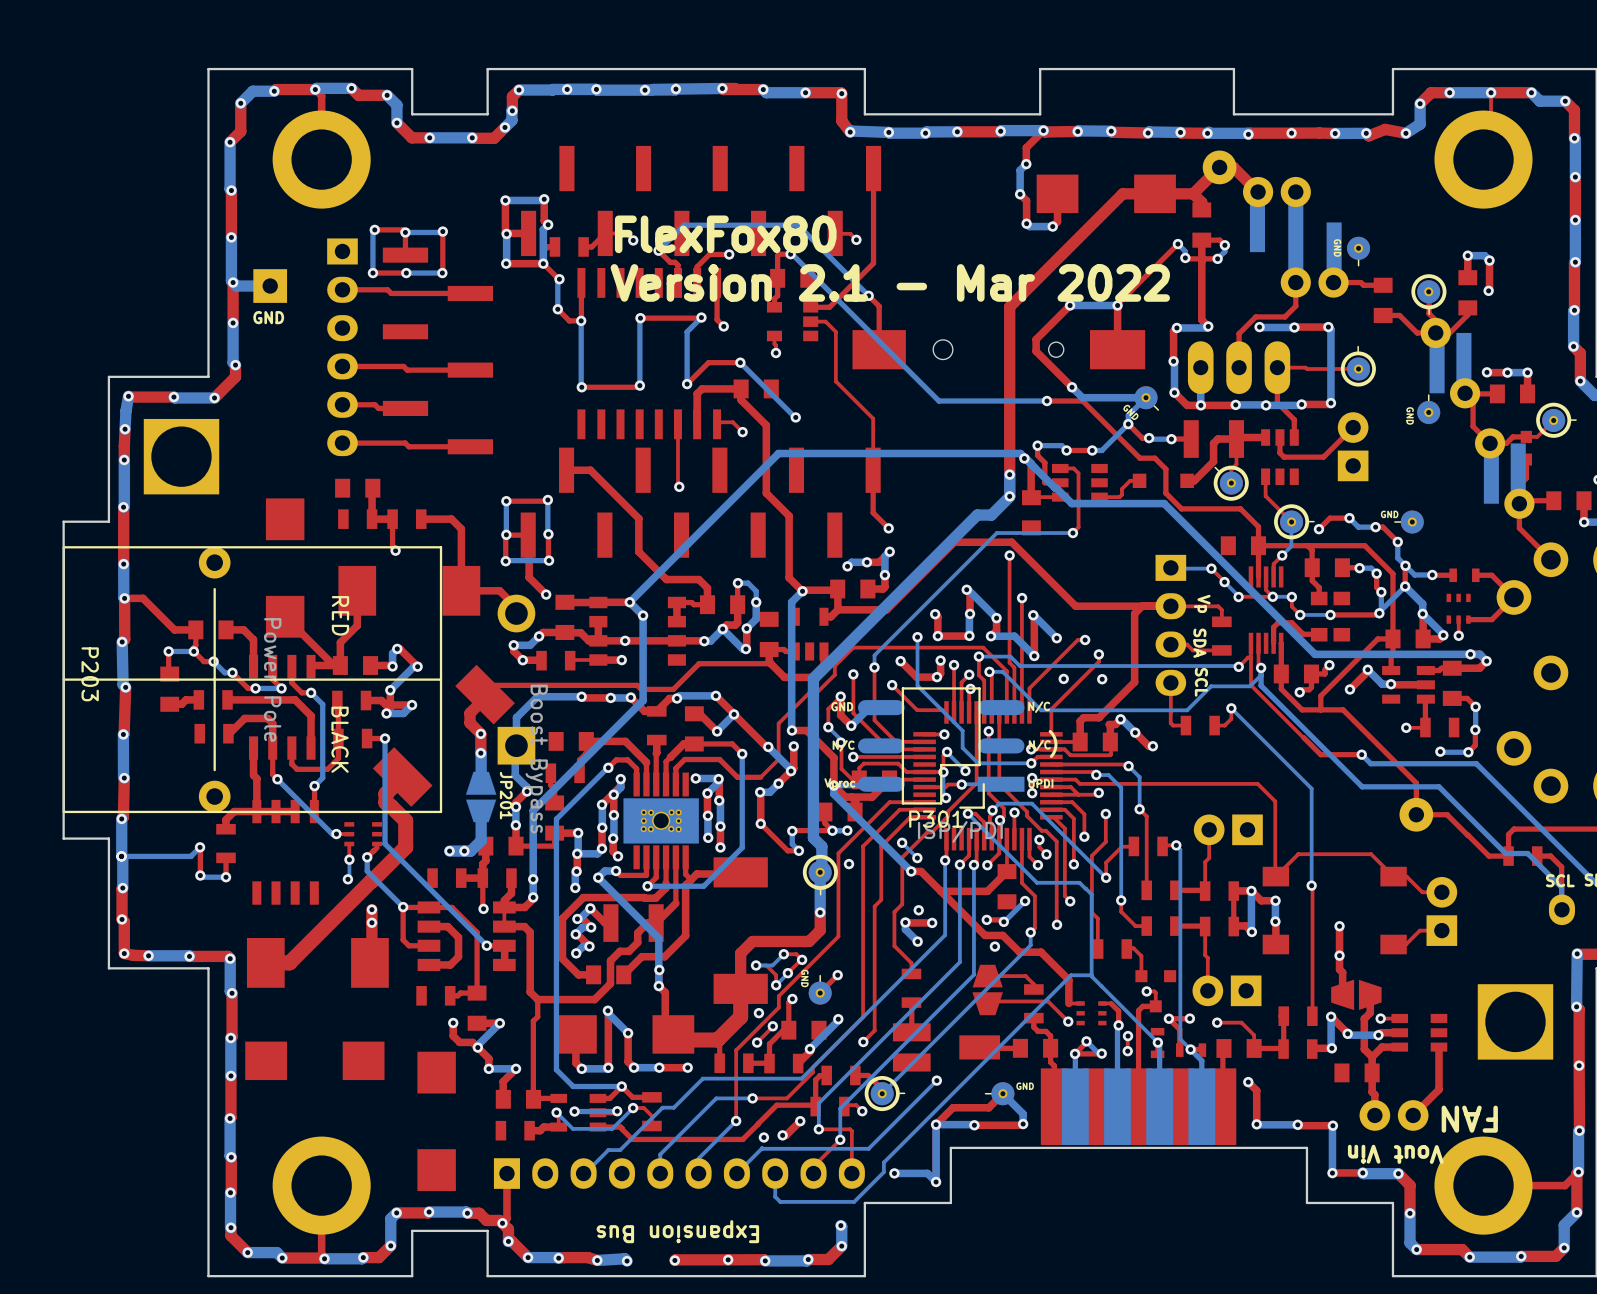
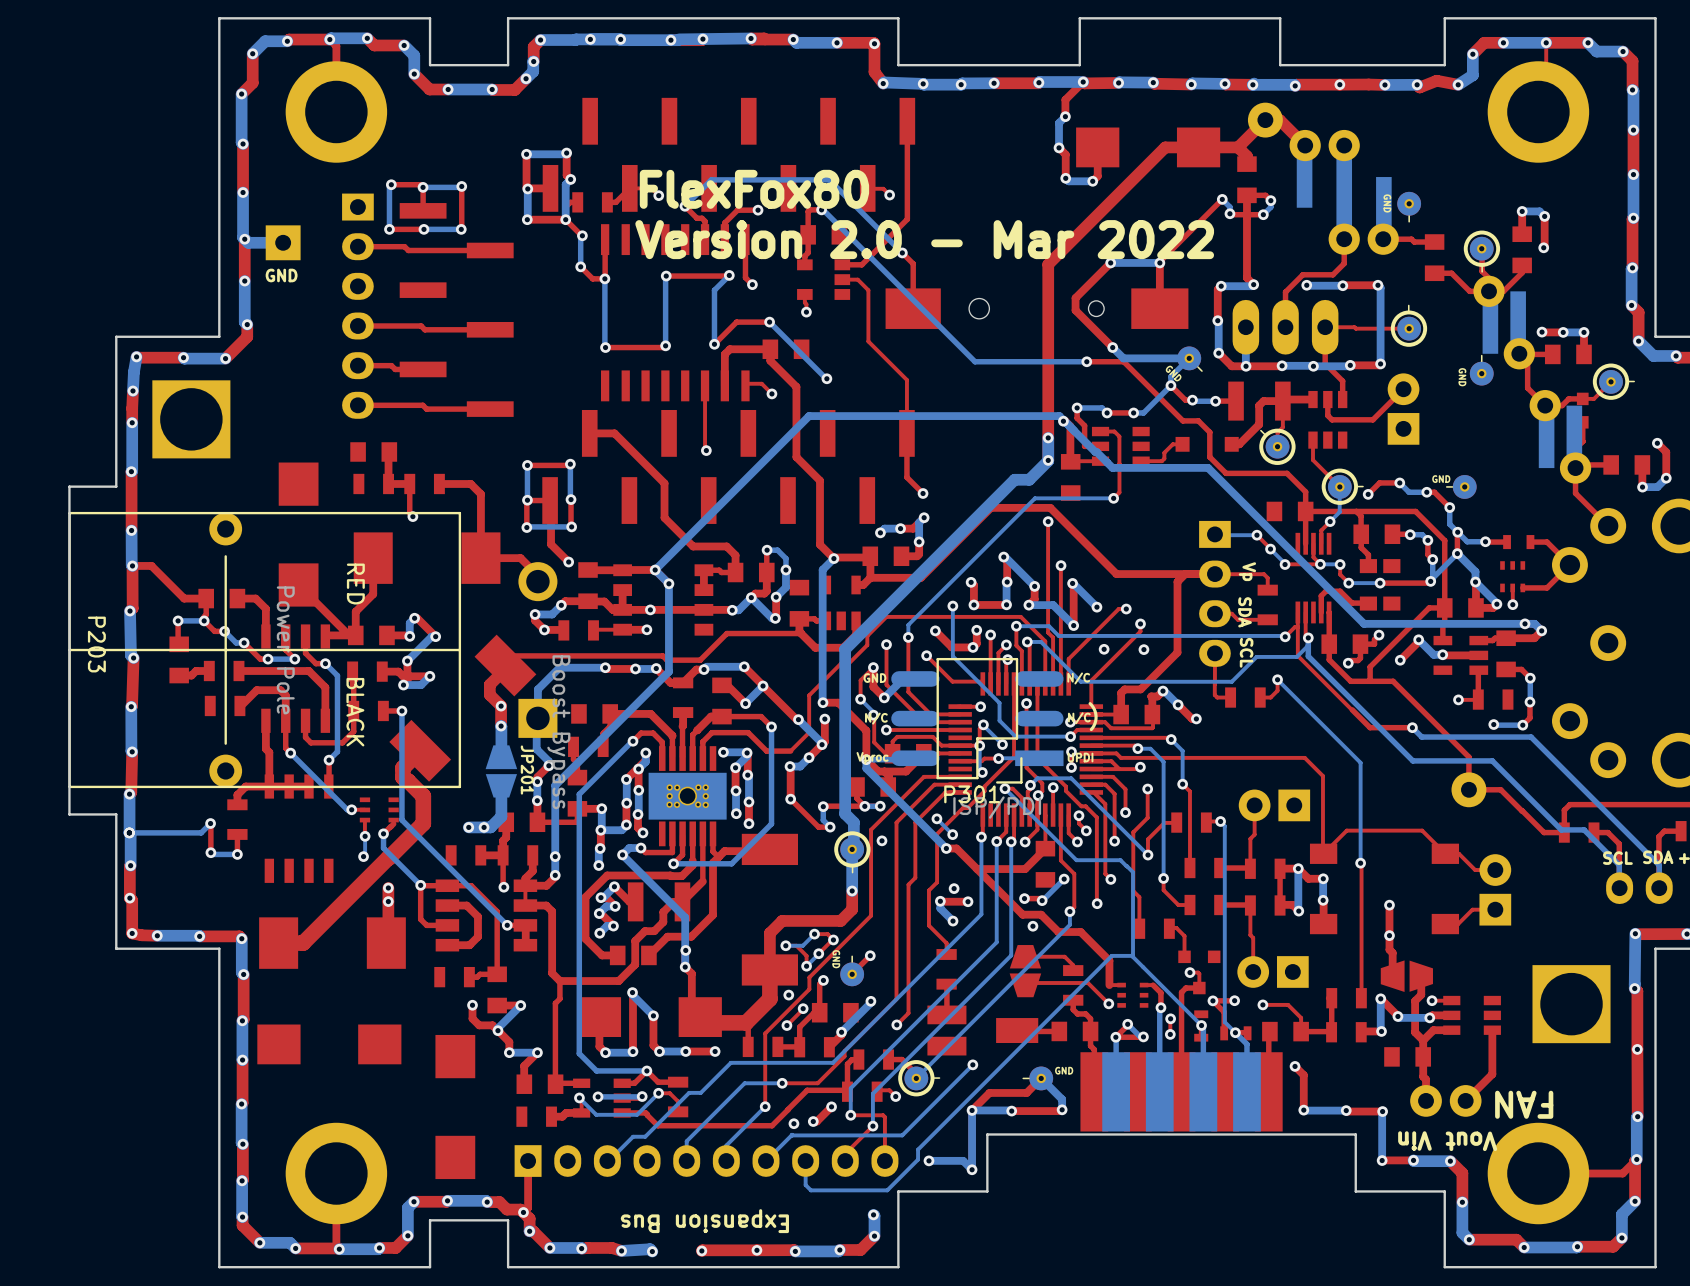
text: Version 2.1 - Mar 2022 (890, 282) -> Version 2.0 - Mar 2022 (924, 239)

